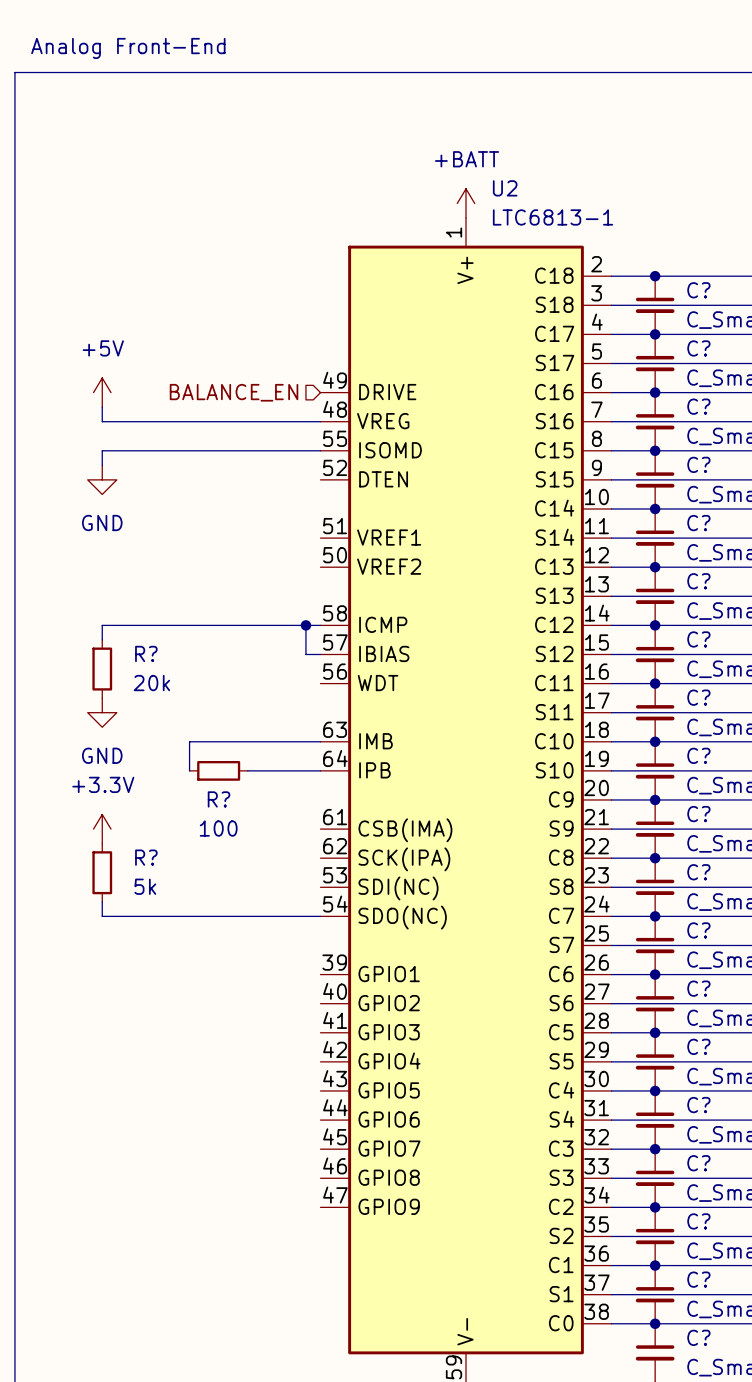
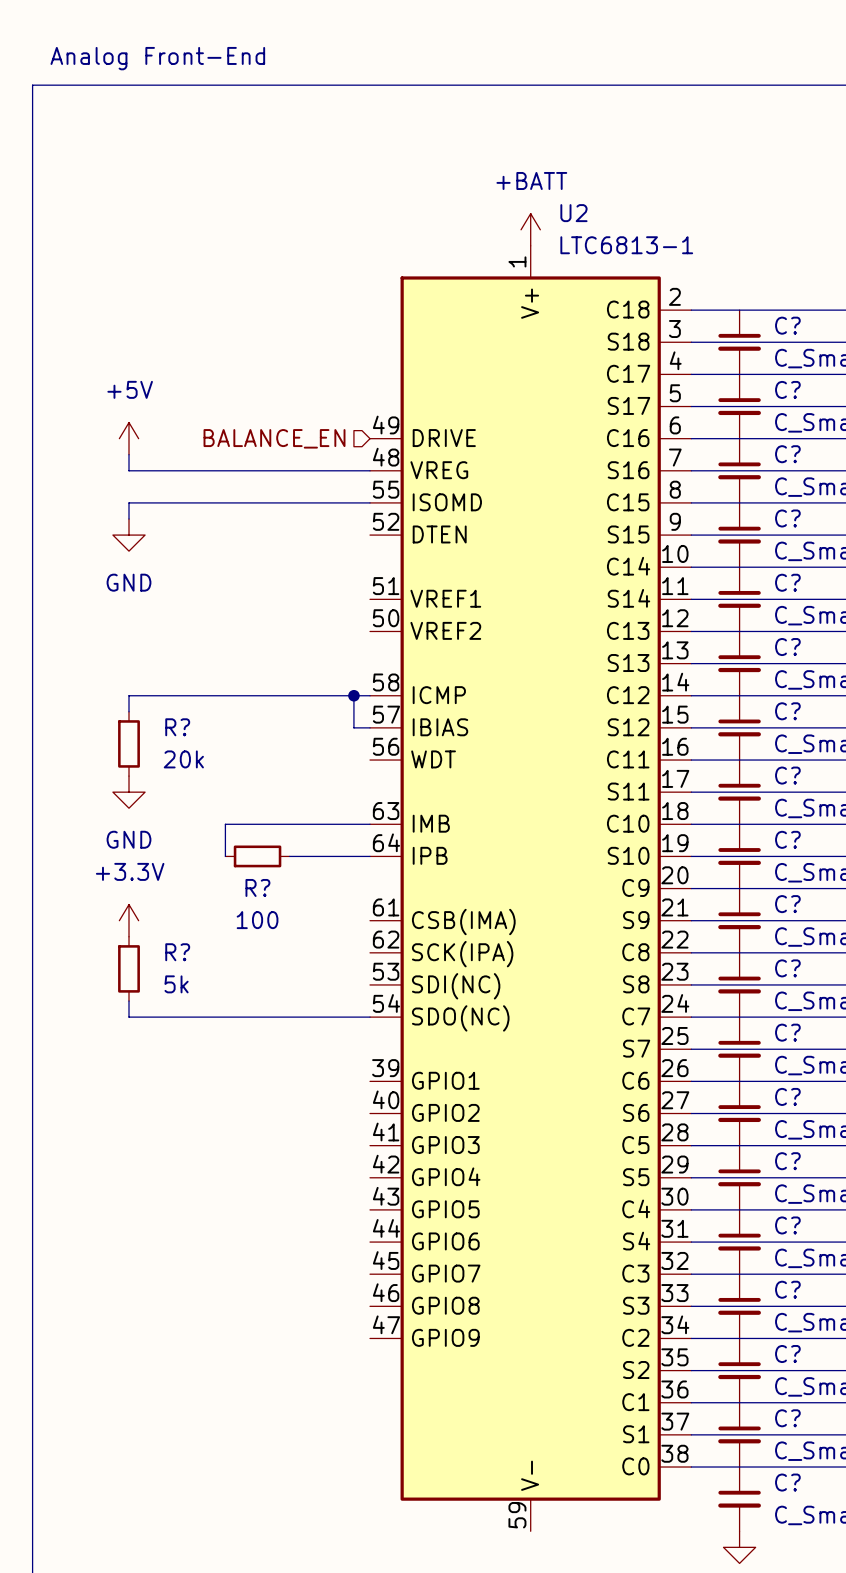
junction: (655, 276) -> none
junction: (655, 334) -> none
junction: (655, 392) -> none
junction: (655, 450) -> none
junction: (655, 508) -> none
junction: (655, 567) -> none
junction: (655, 625) -> none
junction: (655, 683) -> none
junction: (655, 741) -> none
junction: (655, 799) -> none
junction: (655, 858) -> none
junction: (655, 916) -> none
junction: (655, 974) -> none
junction: (655, 1032) -> none
junction: (655, 1090) -> none
junction: (655, 1149) -> none
junction: (655, 1207) -> none
junction: (655, 1265) -> none
junction: (655, 1323) -> none

